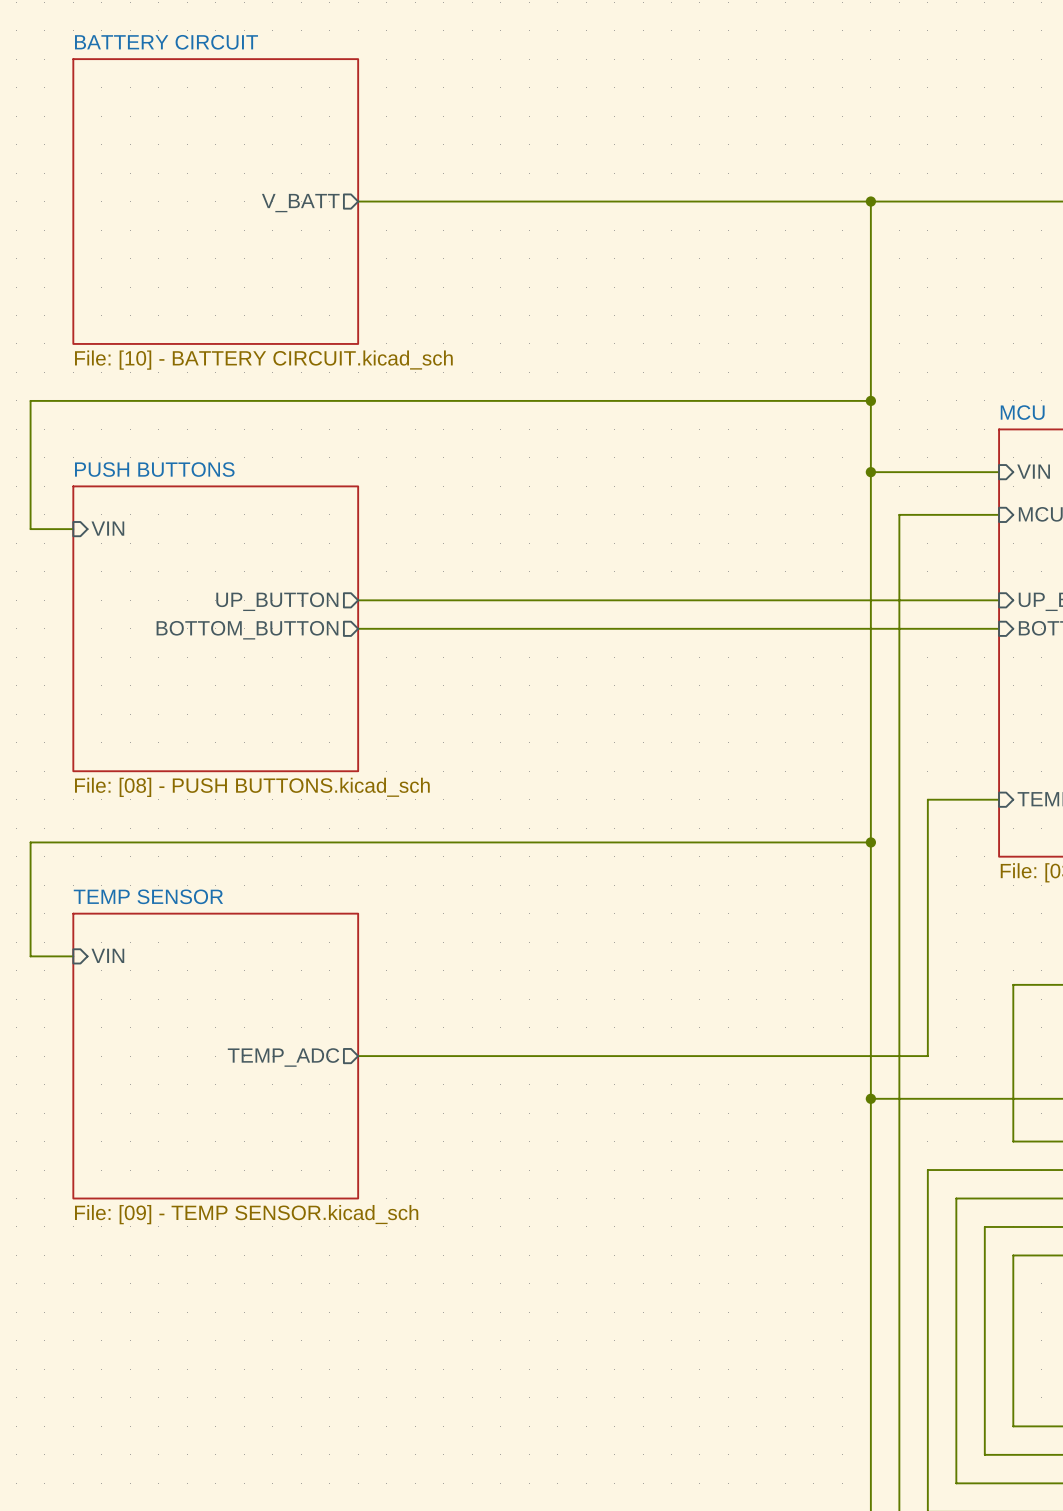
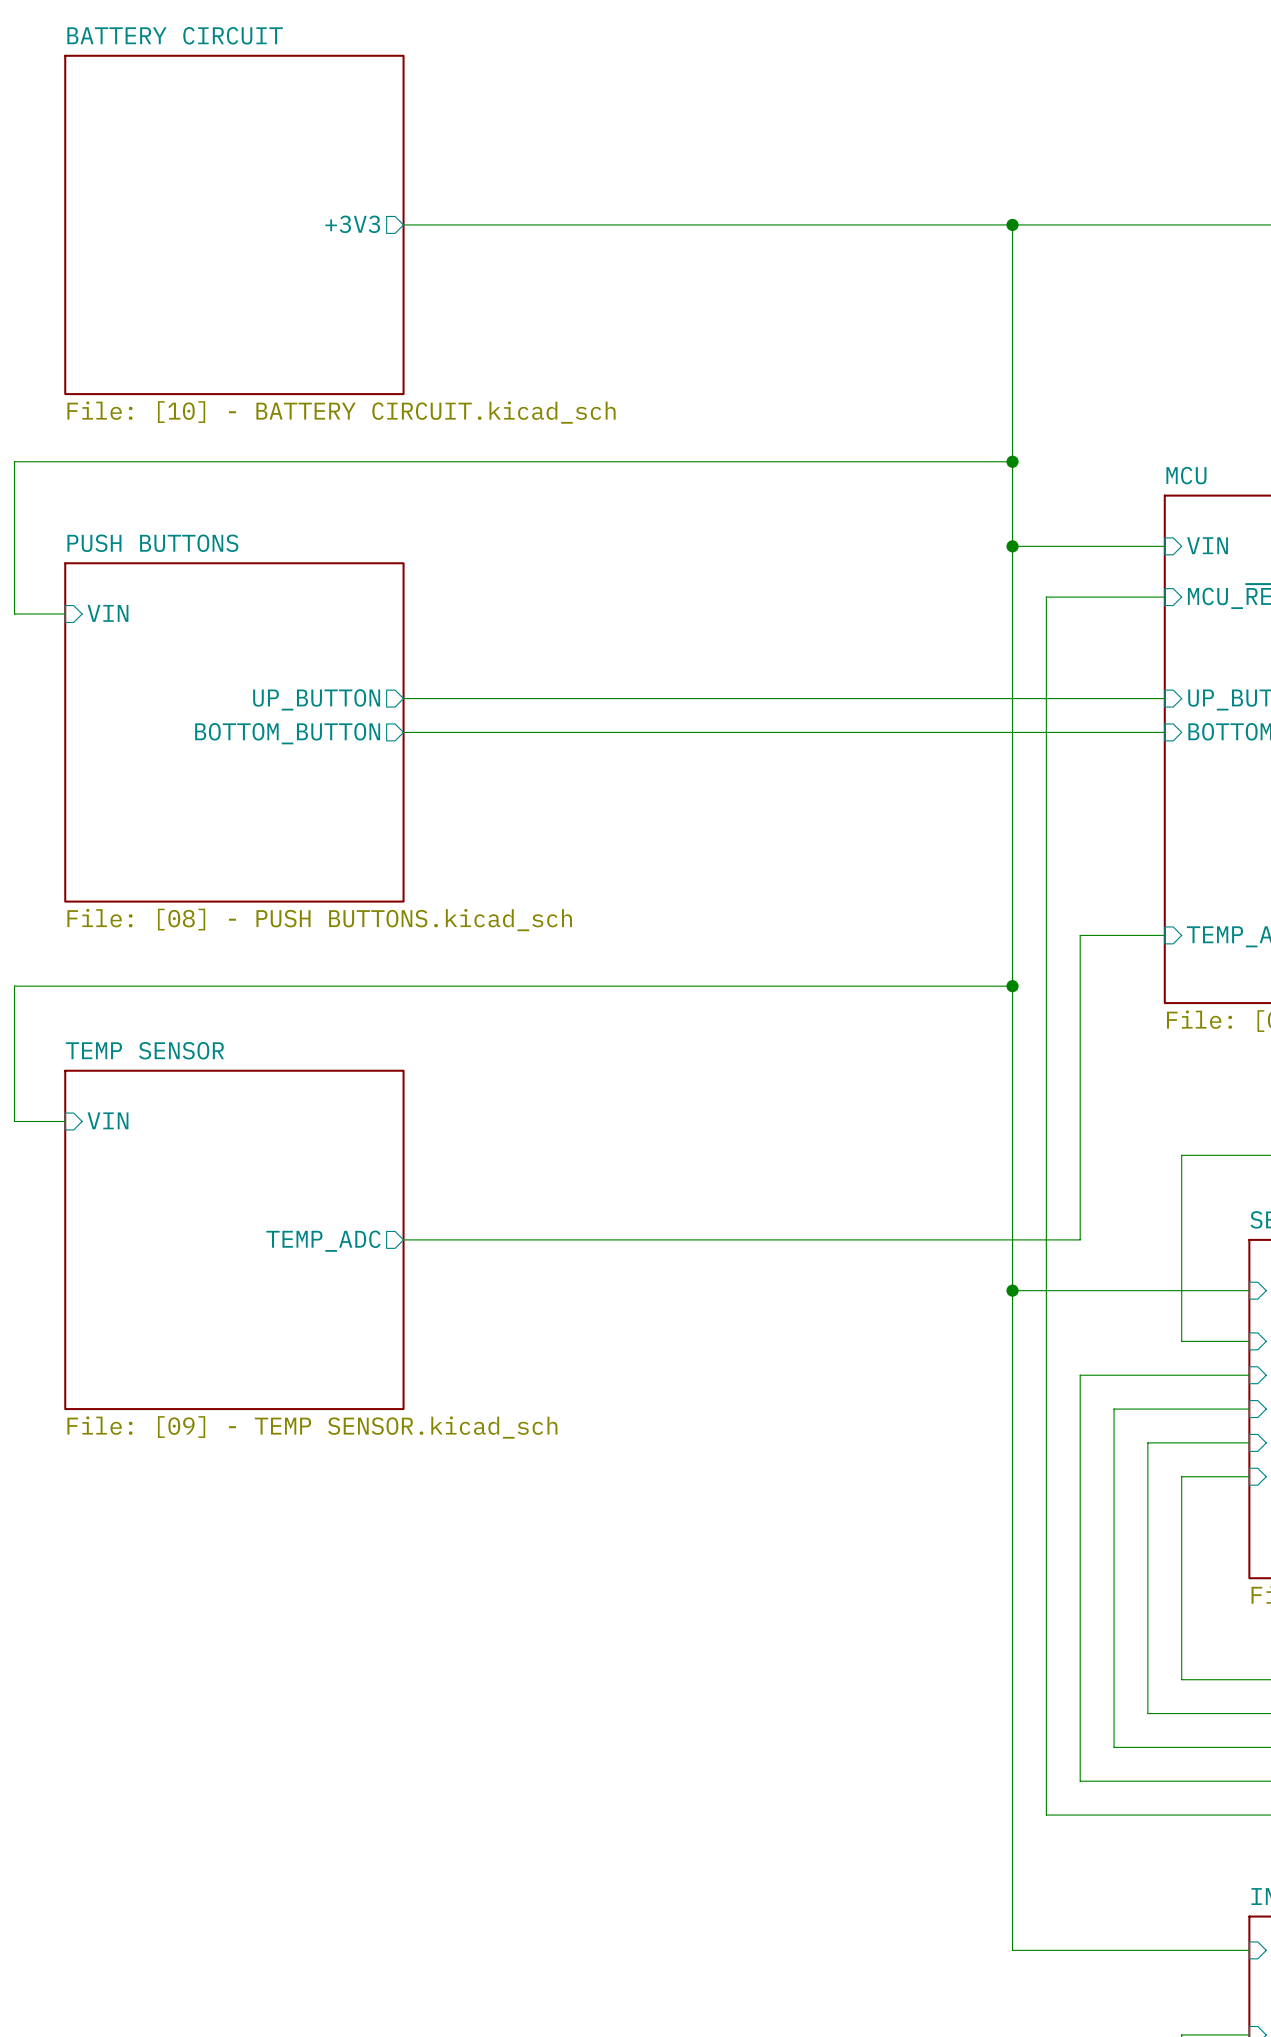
sheet pin: V_BATT (300, 203) -> +3V3 (352, 224)

